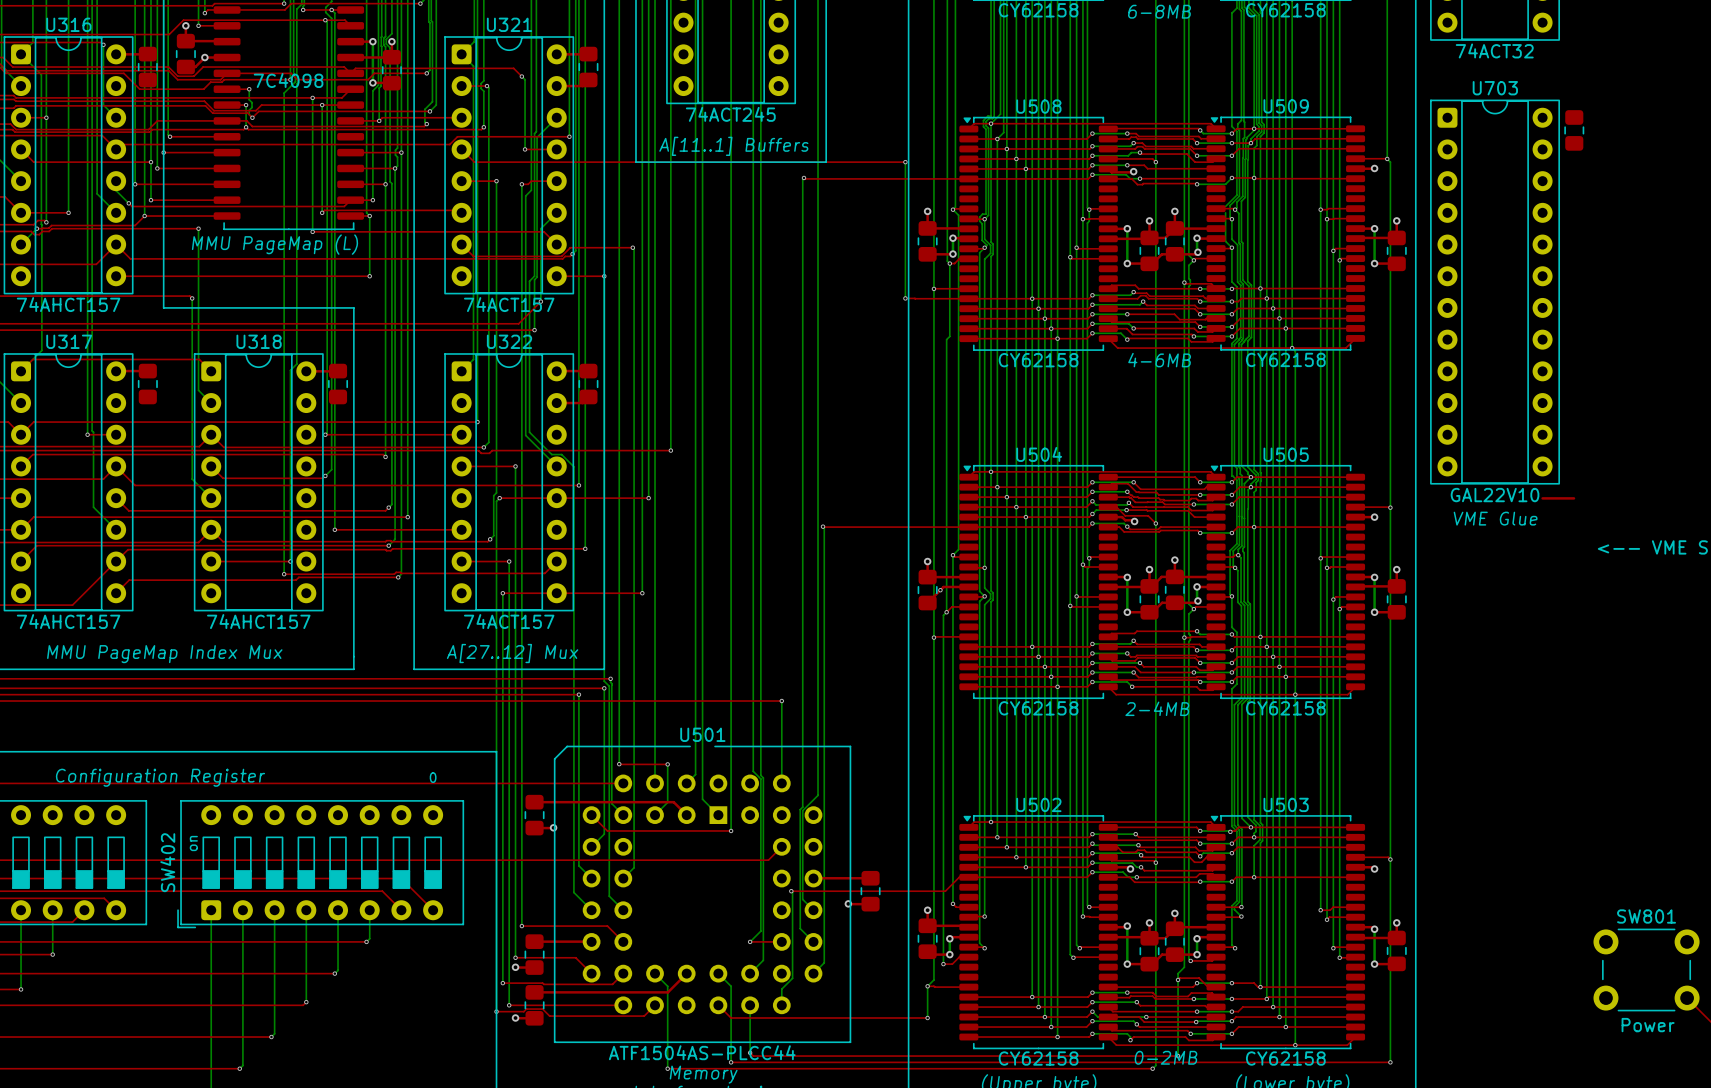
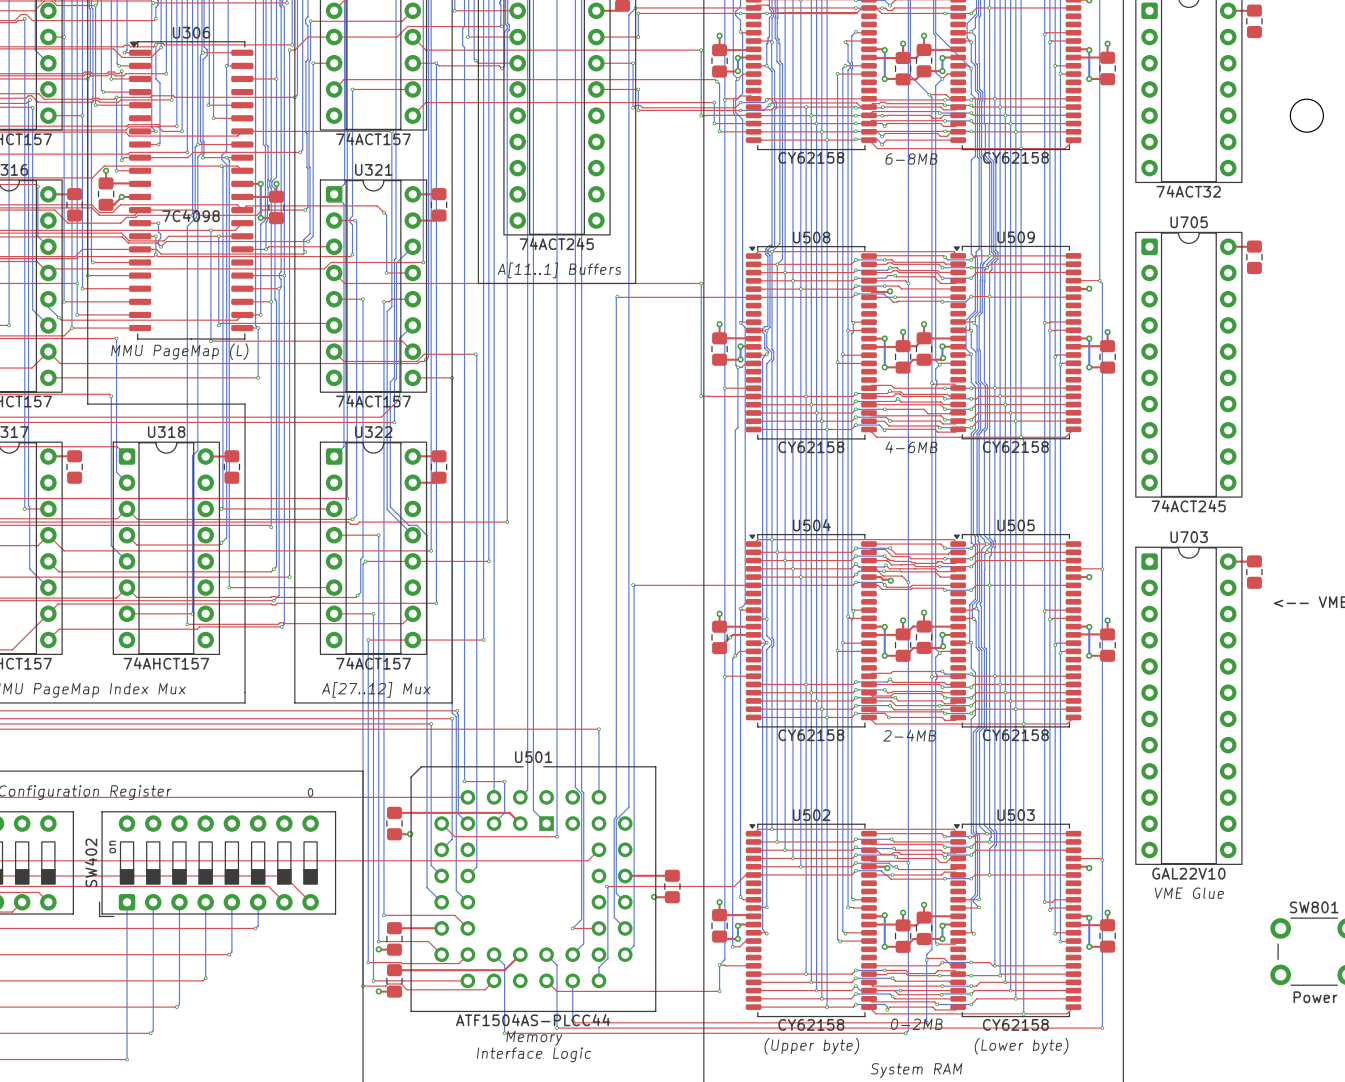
top track: none -> (1228, 246) (1254, 246)
U705: none -> 74ACT245 (1188, 364)
U703 position: (1495, 292) -> (1188, 705)
part: none -> (1254, 572)
text: VME Glue (1495, 518) -> none
text: none -> VME Glue (1189, 893)

